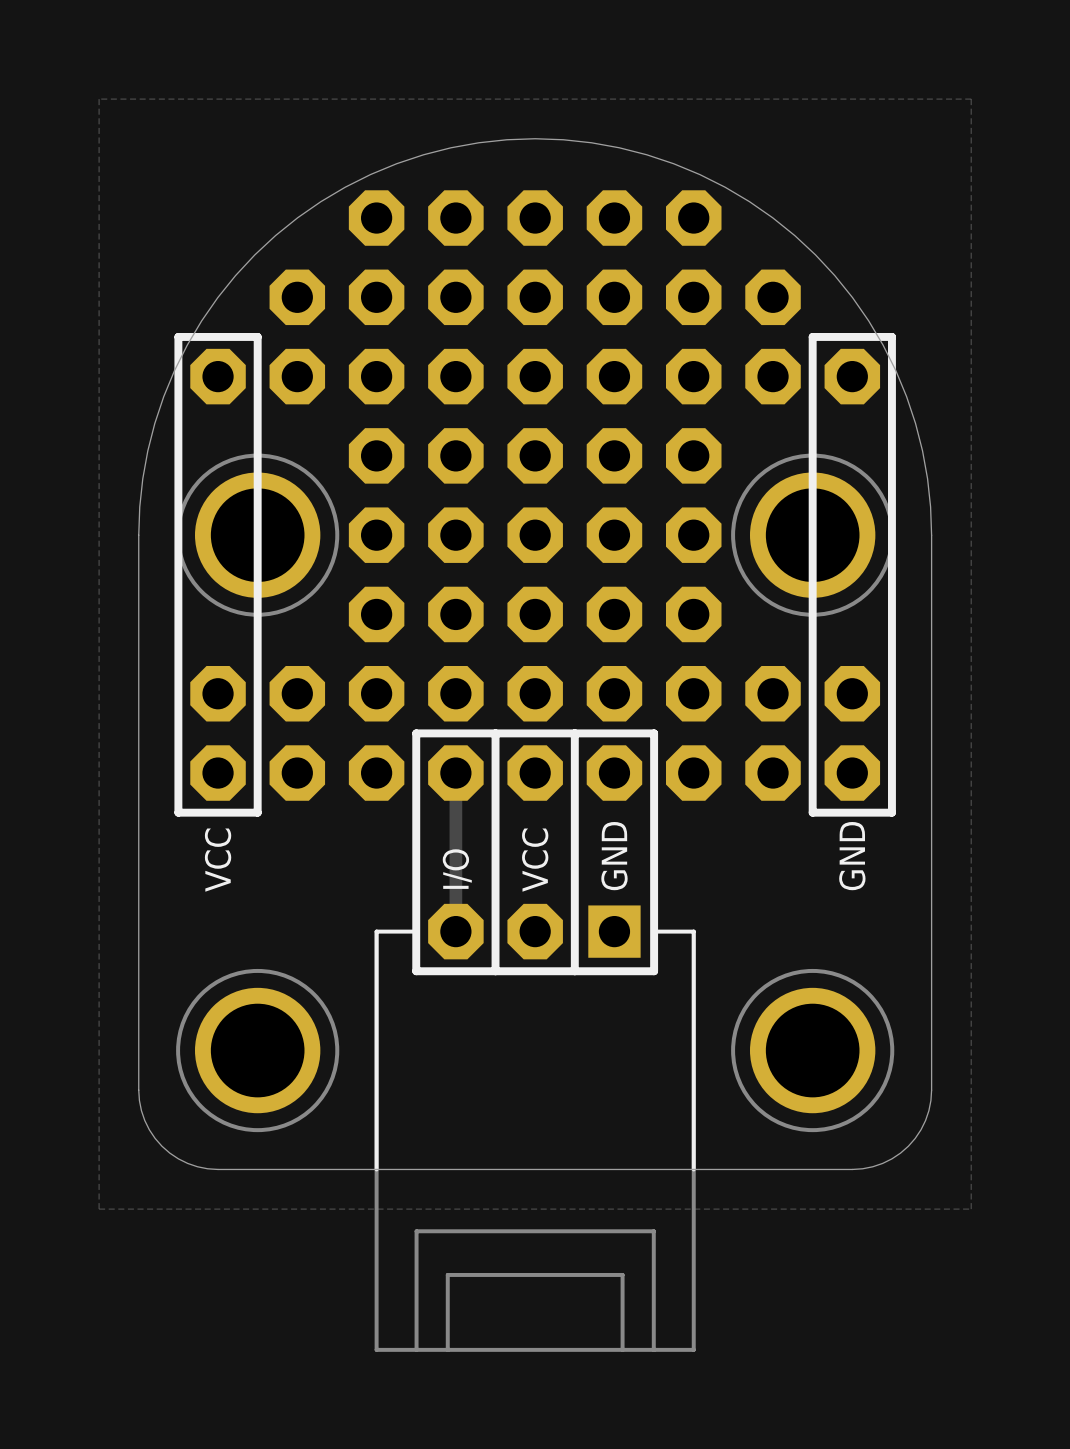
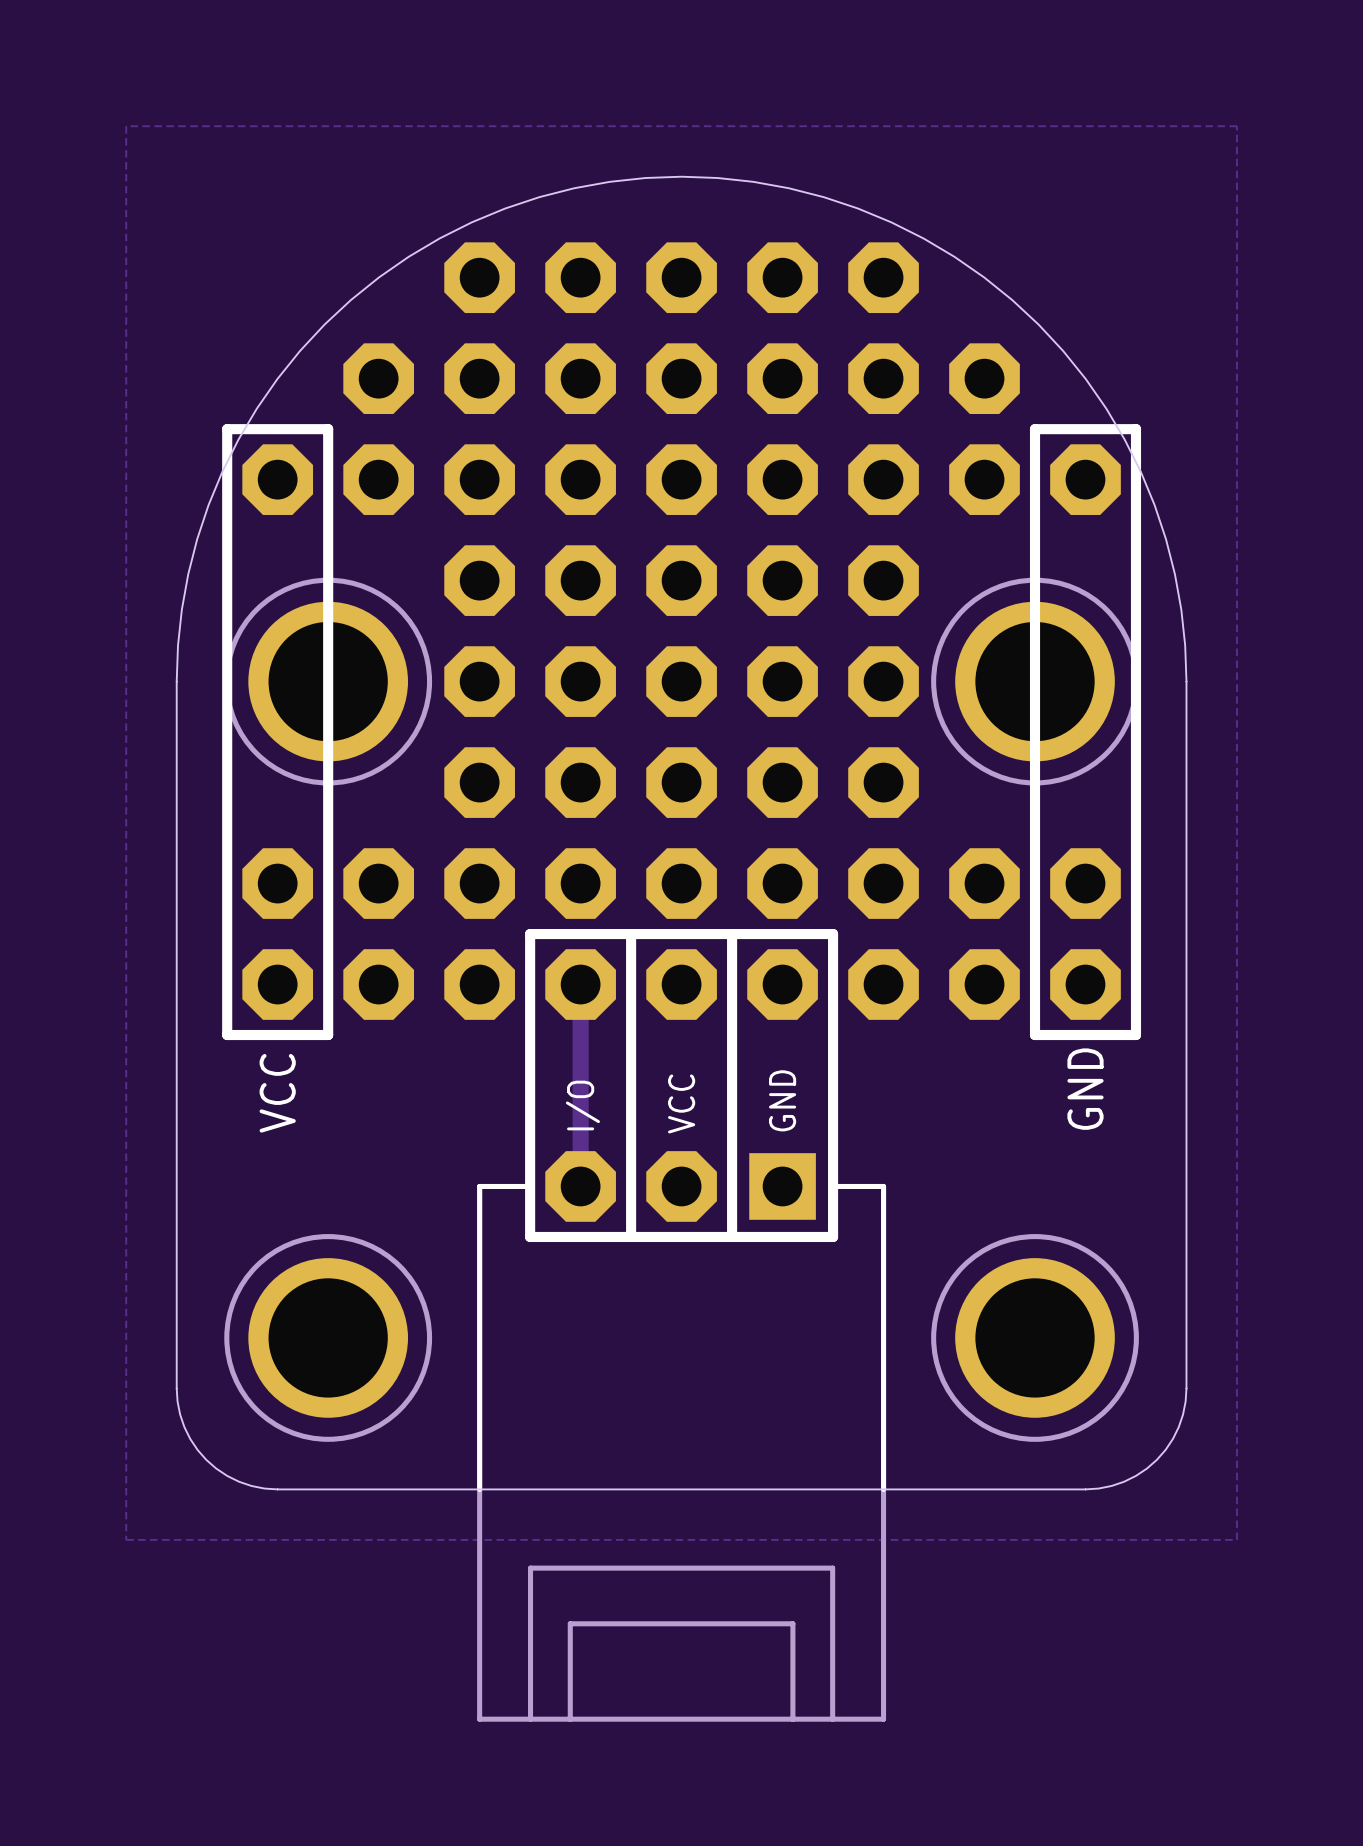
part footprint: [138, 138, 932, 1352] -> [176, 176, 1187, 1722]

